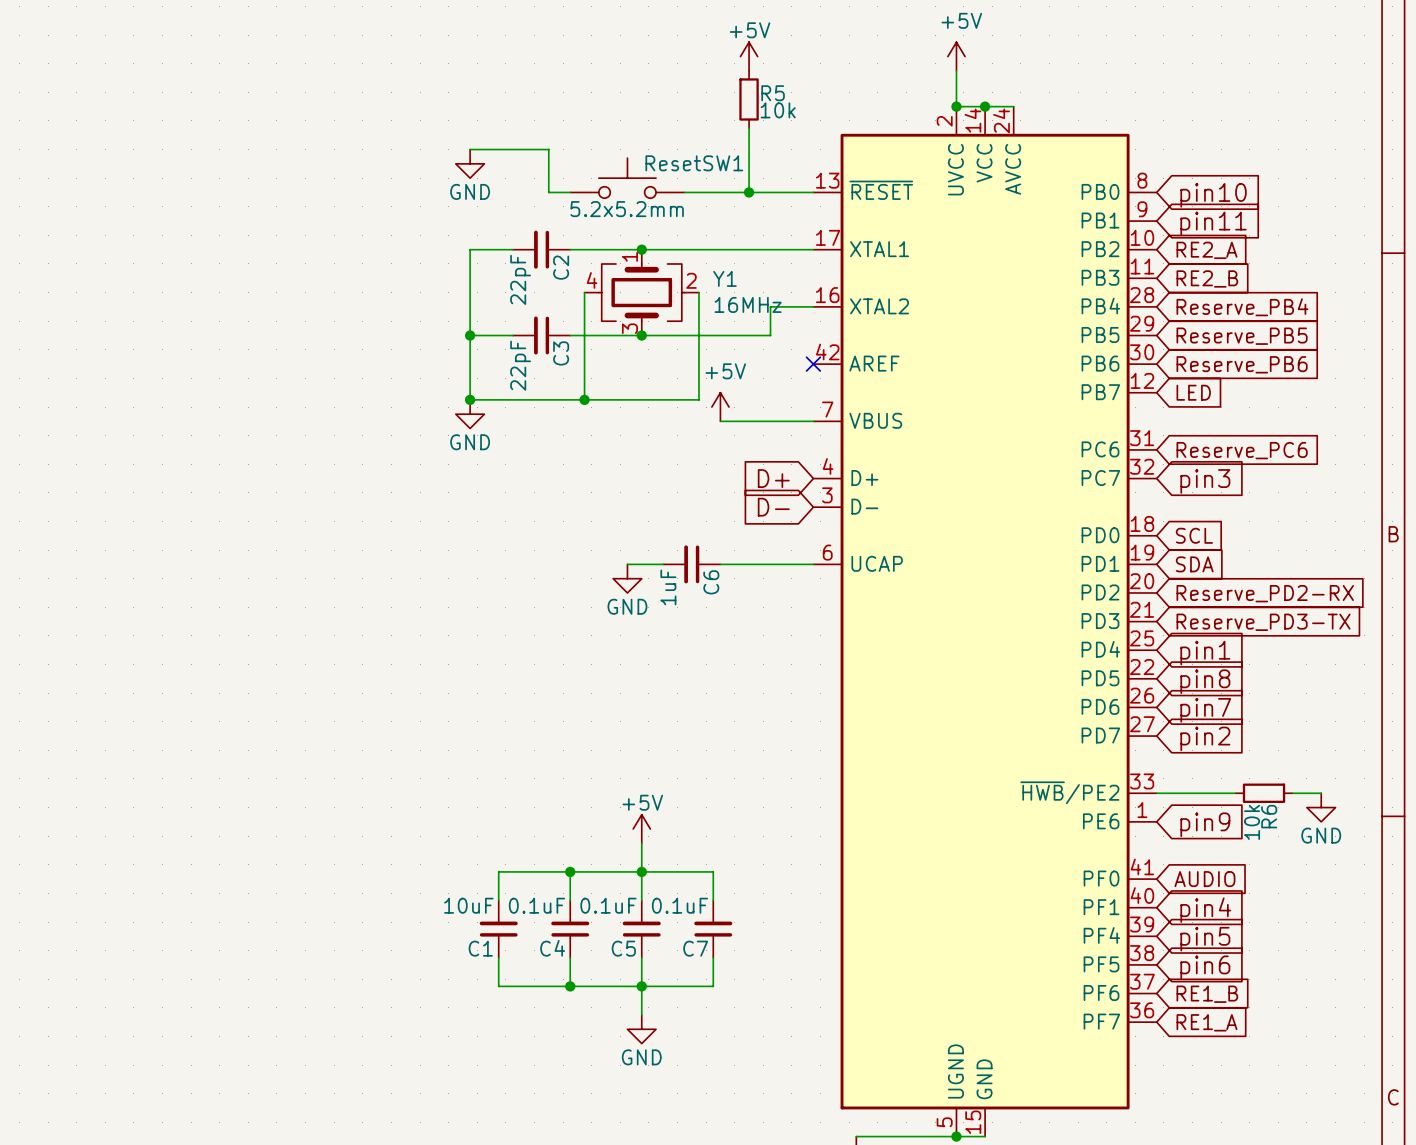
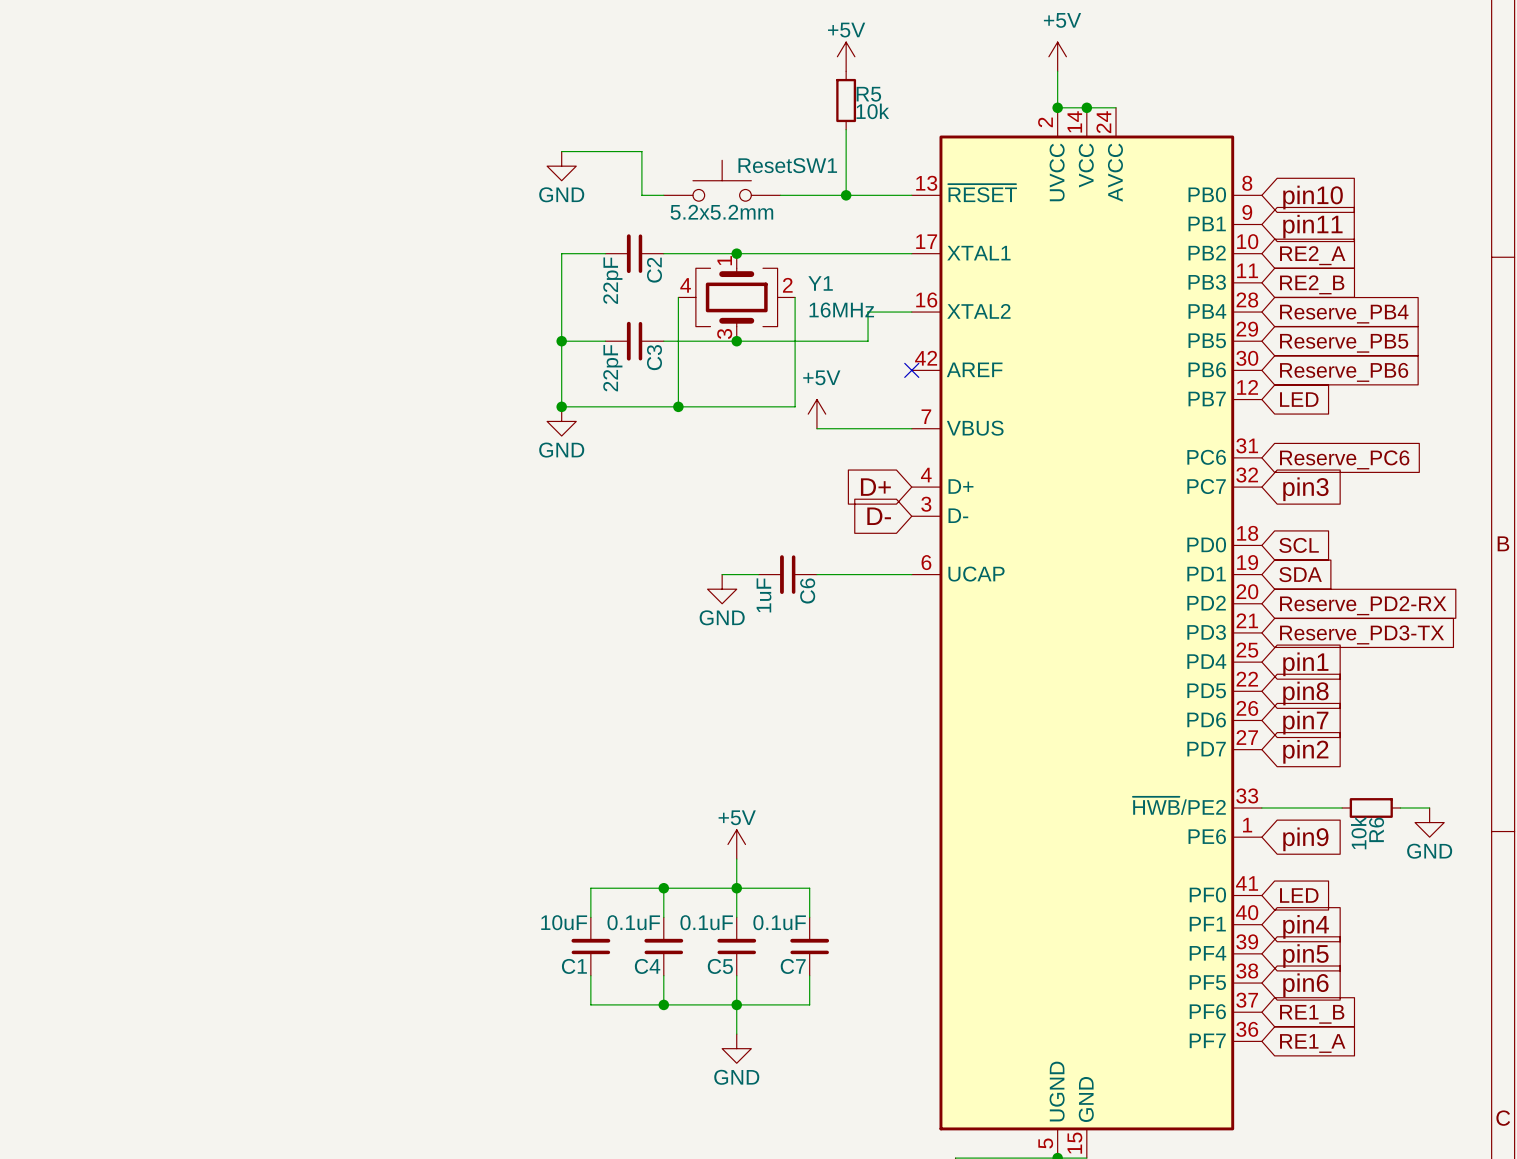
global label: AUDIO (1204, 879) -> LED (1299, 895)

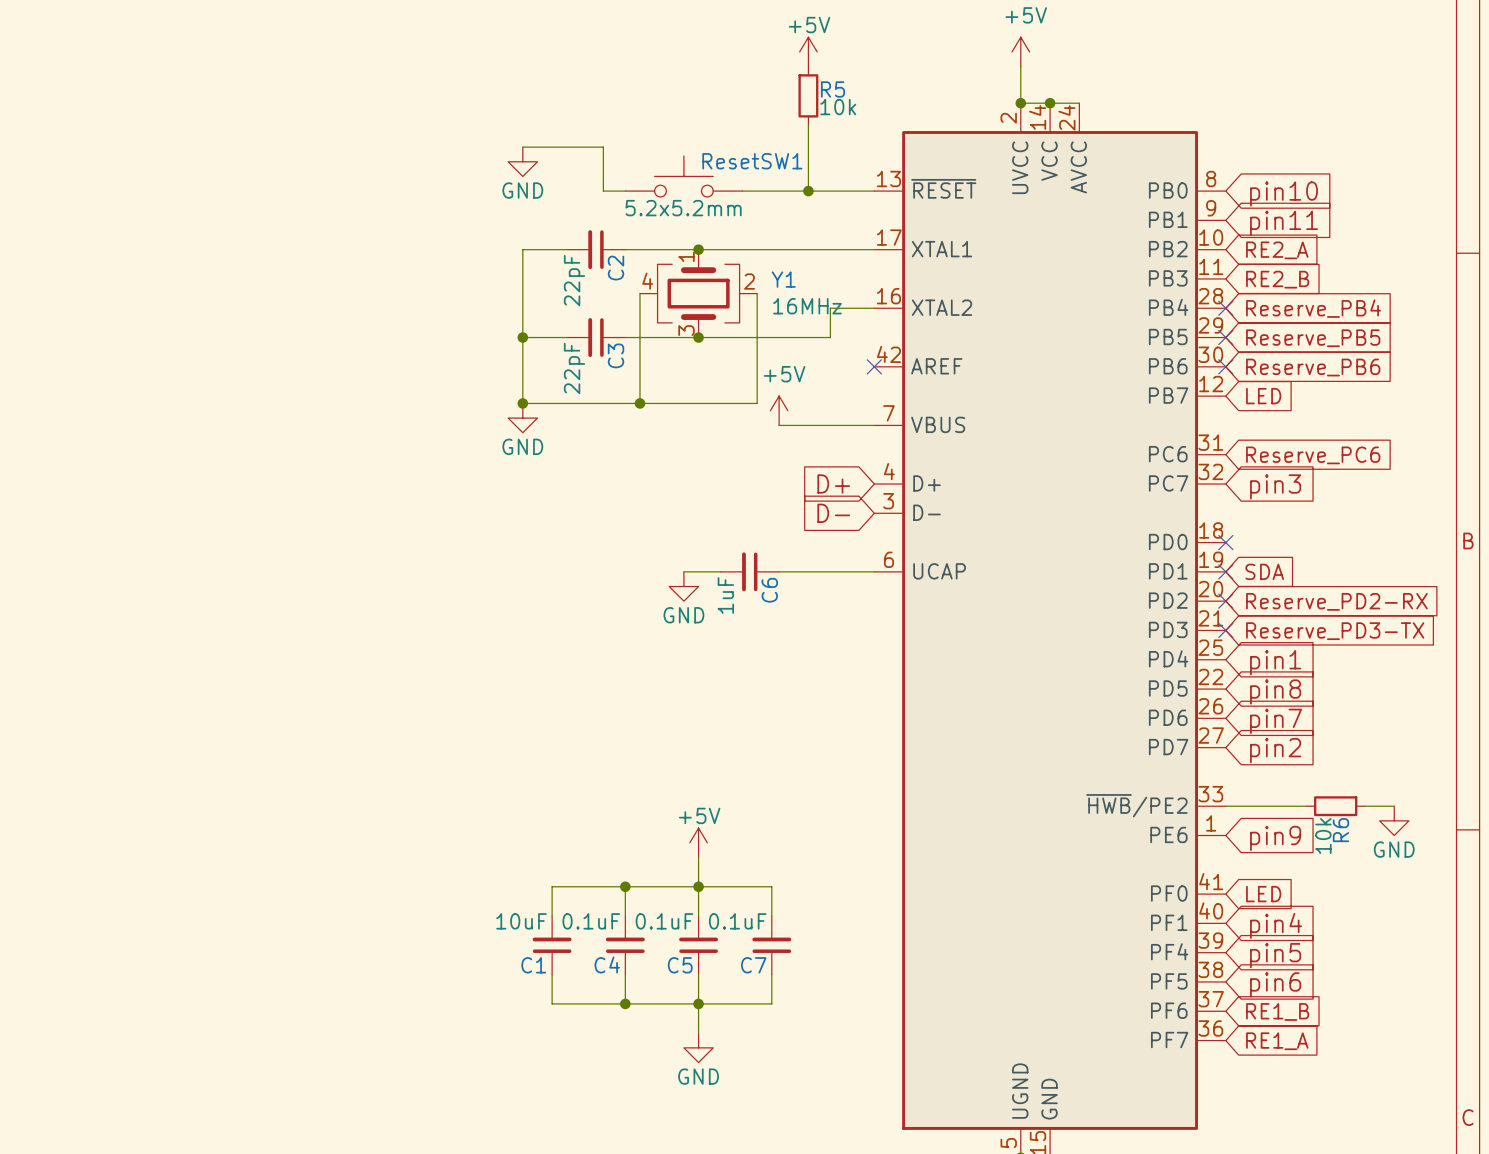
no-connect mark: none -> (1225, 308)
no-connect mark: none -> (1225, 337)
no-connect mark: none -> (1225, 366)
no-connect mark: none -> (1225, 542)
global label: SCL (1299, 545) -> none
no-connect mark: none -> (1225, 571)
no-connect mark: none -> (1225, 601)
no-connect mark: none -> (1225, 630)

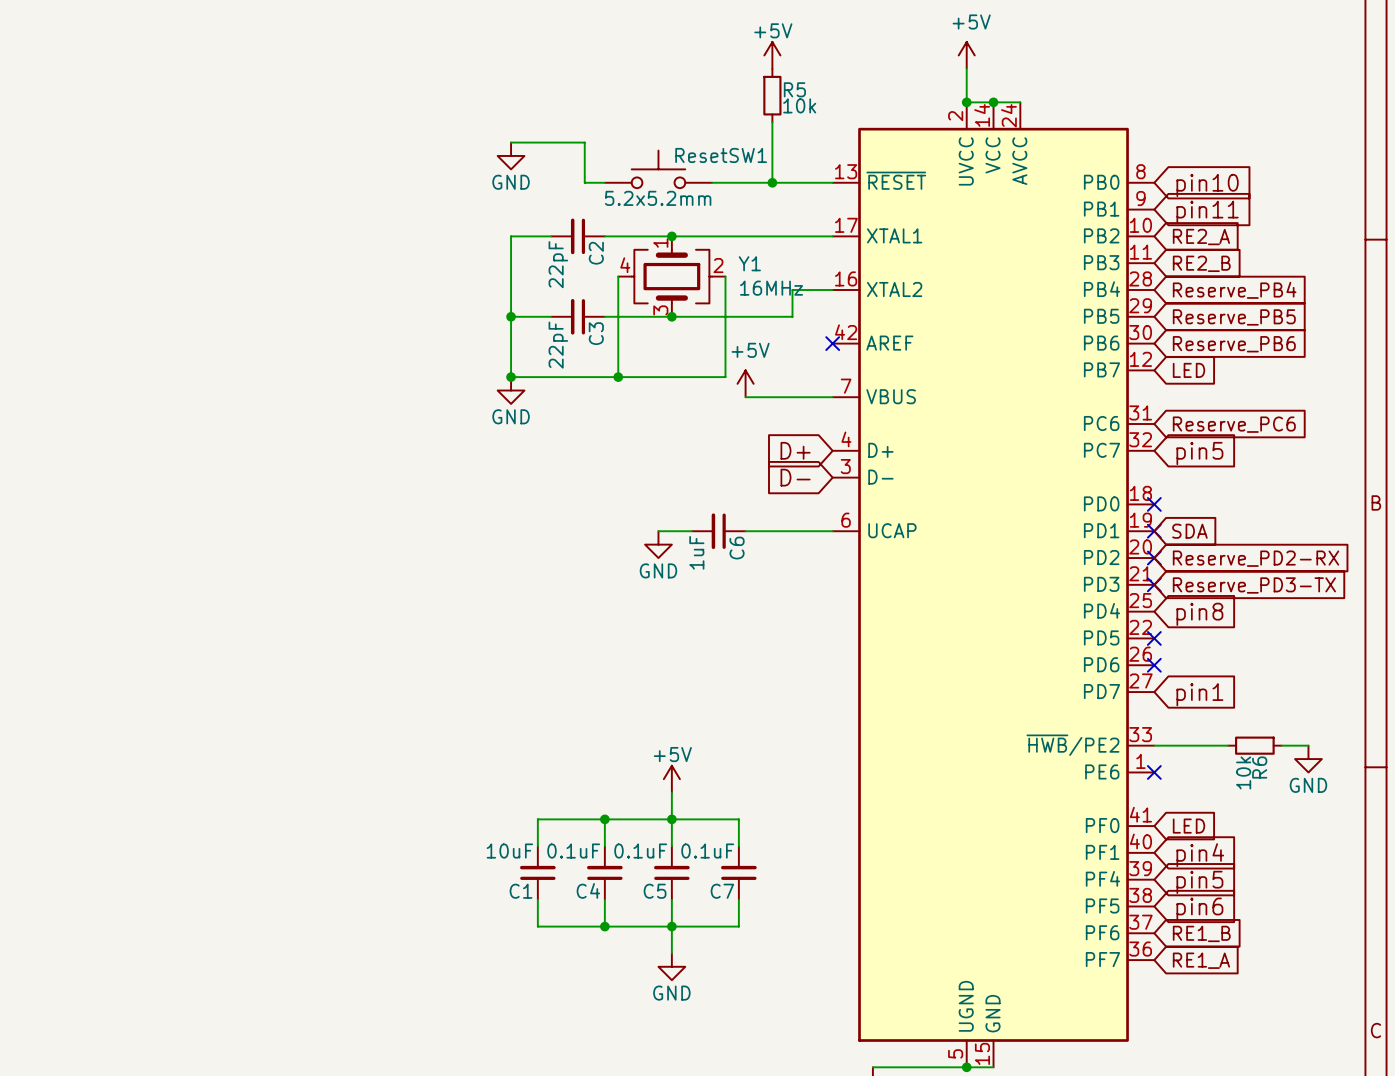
no-connect mark: (1225, 308) -> none
no-connect mark: (1225, 337) -> none
no-connect mark: (1225, 366) -> none
global label: pin3 (1275, 486) -> pin5 (1199, 453)
global label: pin1 (1275, 662) -> pin8 (1199, 614)
no-connect mark: none -> (1154, 638)
global label: pin8 (1275, 691) -> none
no-connect mark: none -> (1154, 665)
global label: pin7 (1276, 721) -> none
global label: pin2 (1275, 750) -> pin1 (1199, 694)
no-connect mark: none -> (1154, 772)
global label: pin9 (1275, 838) -> none

